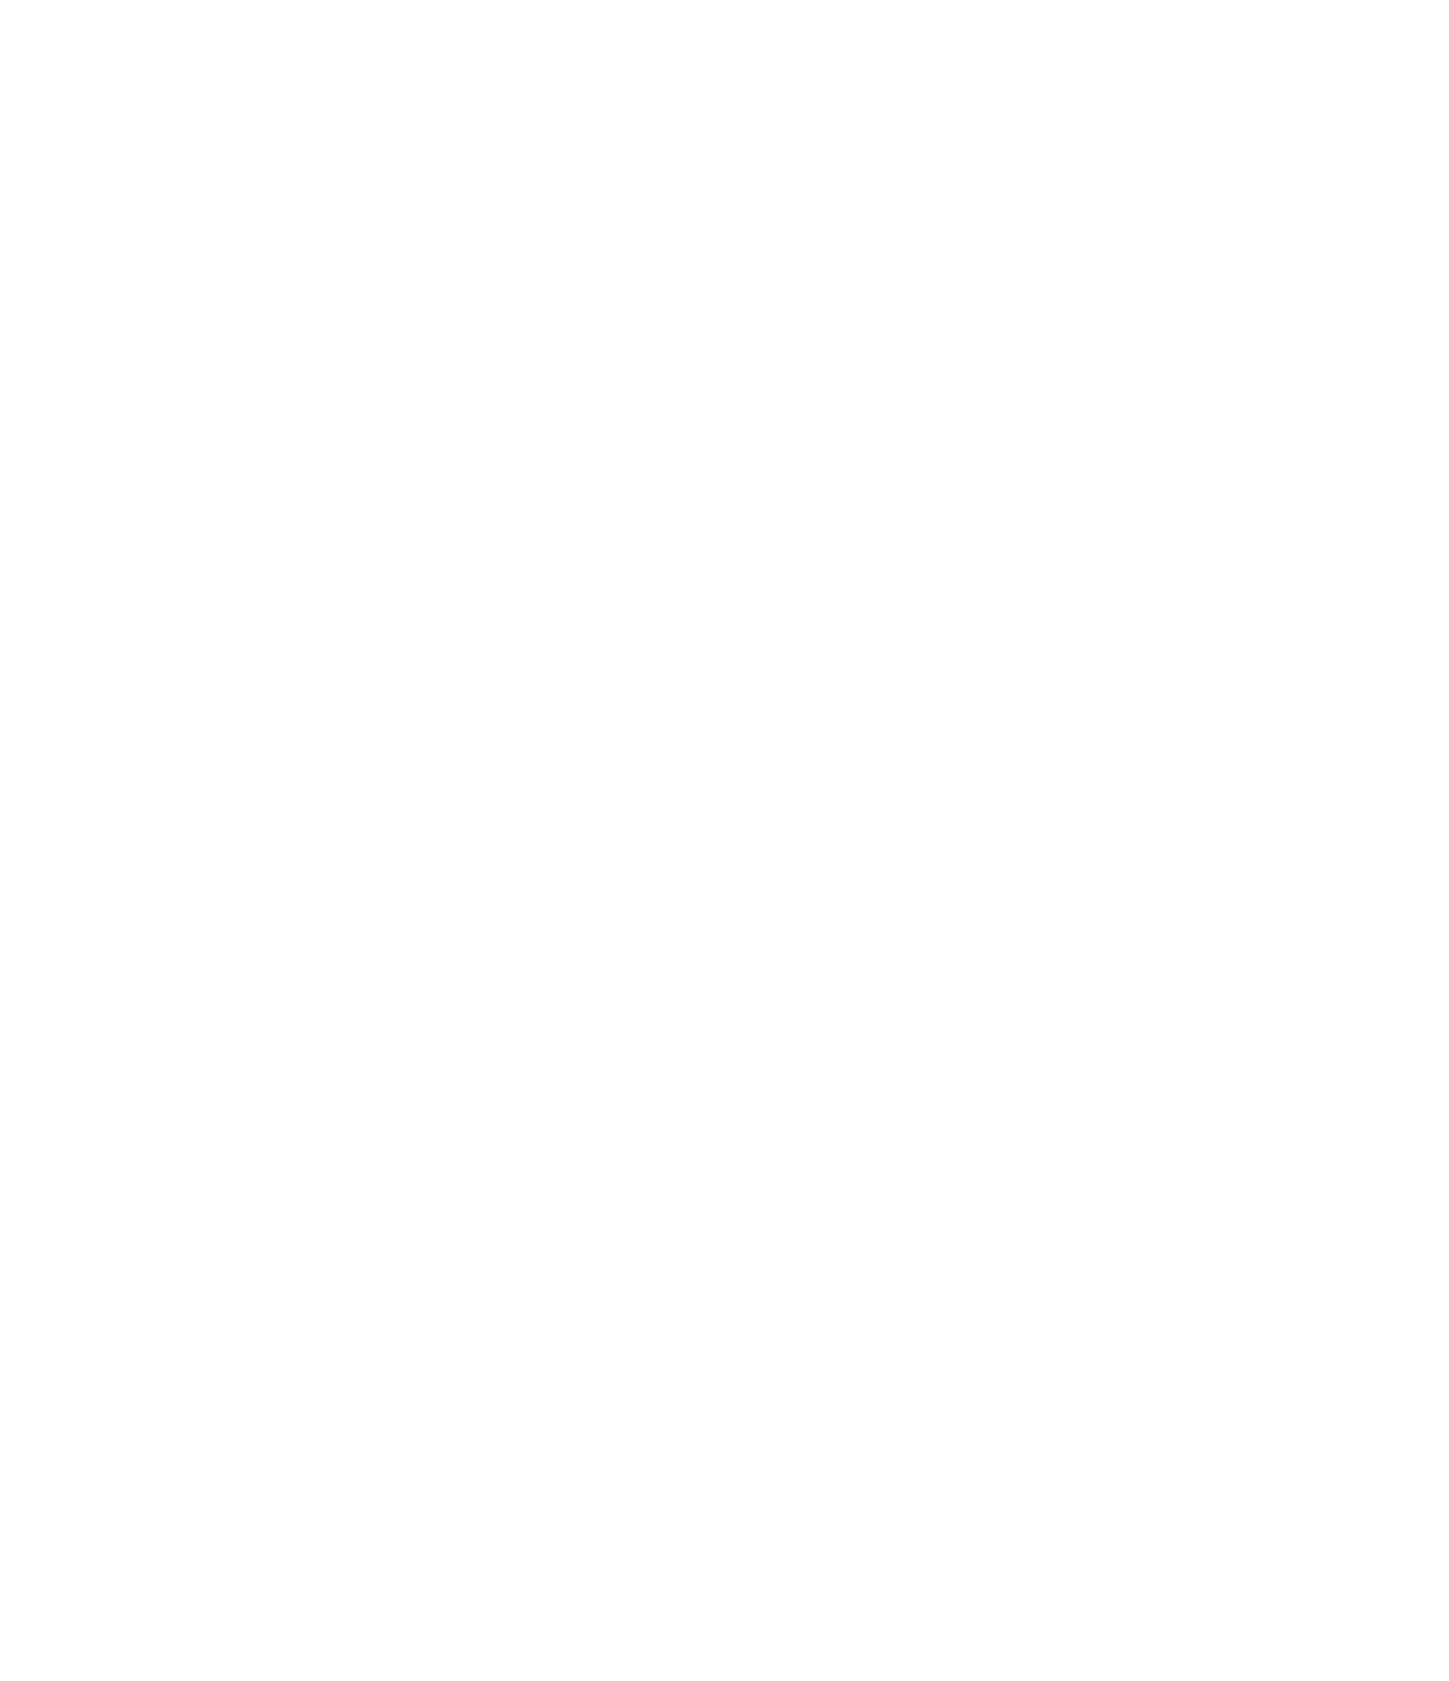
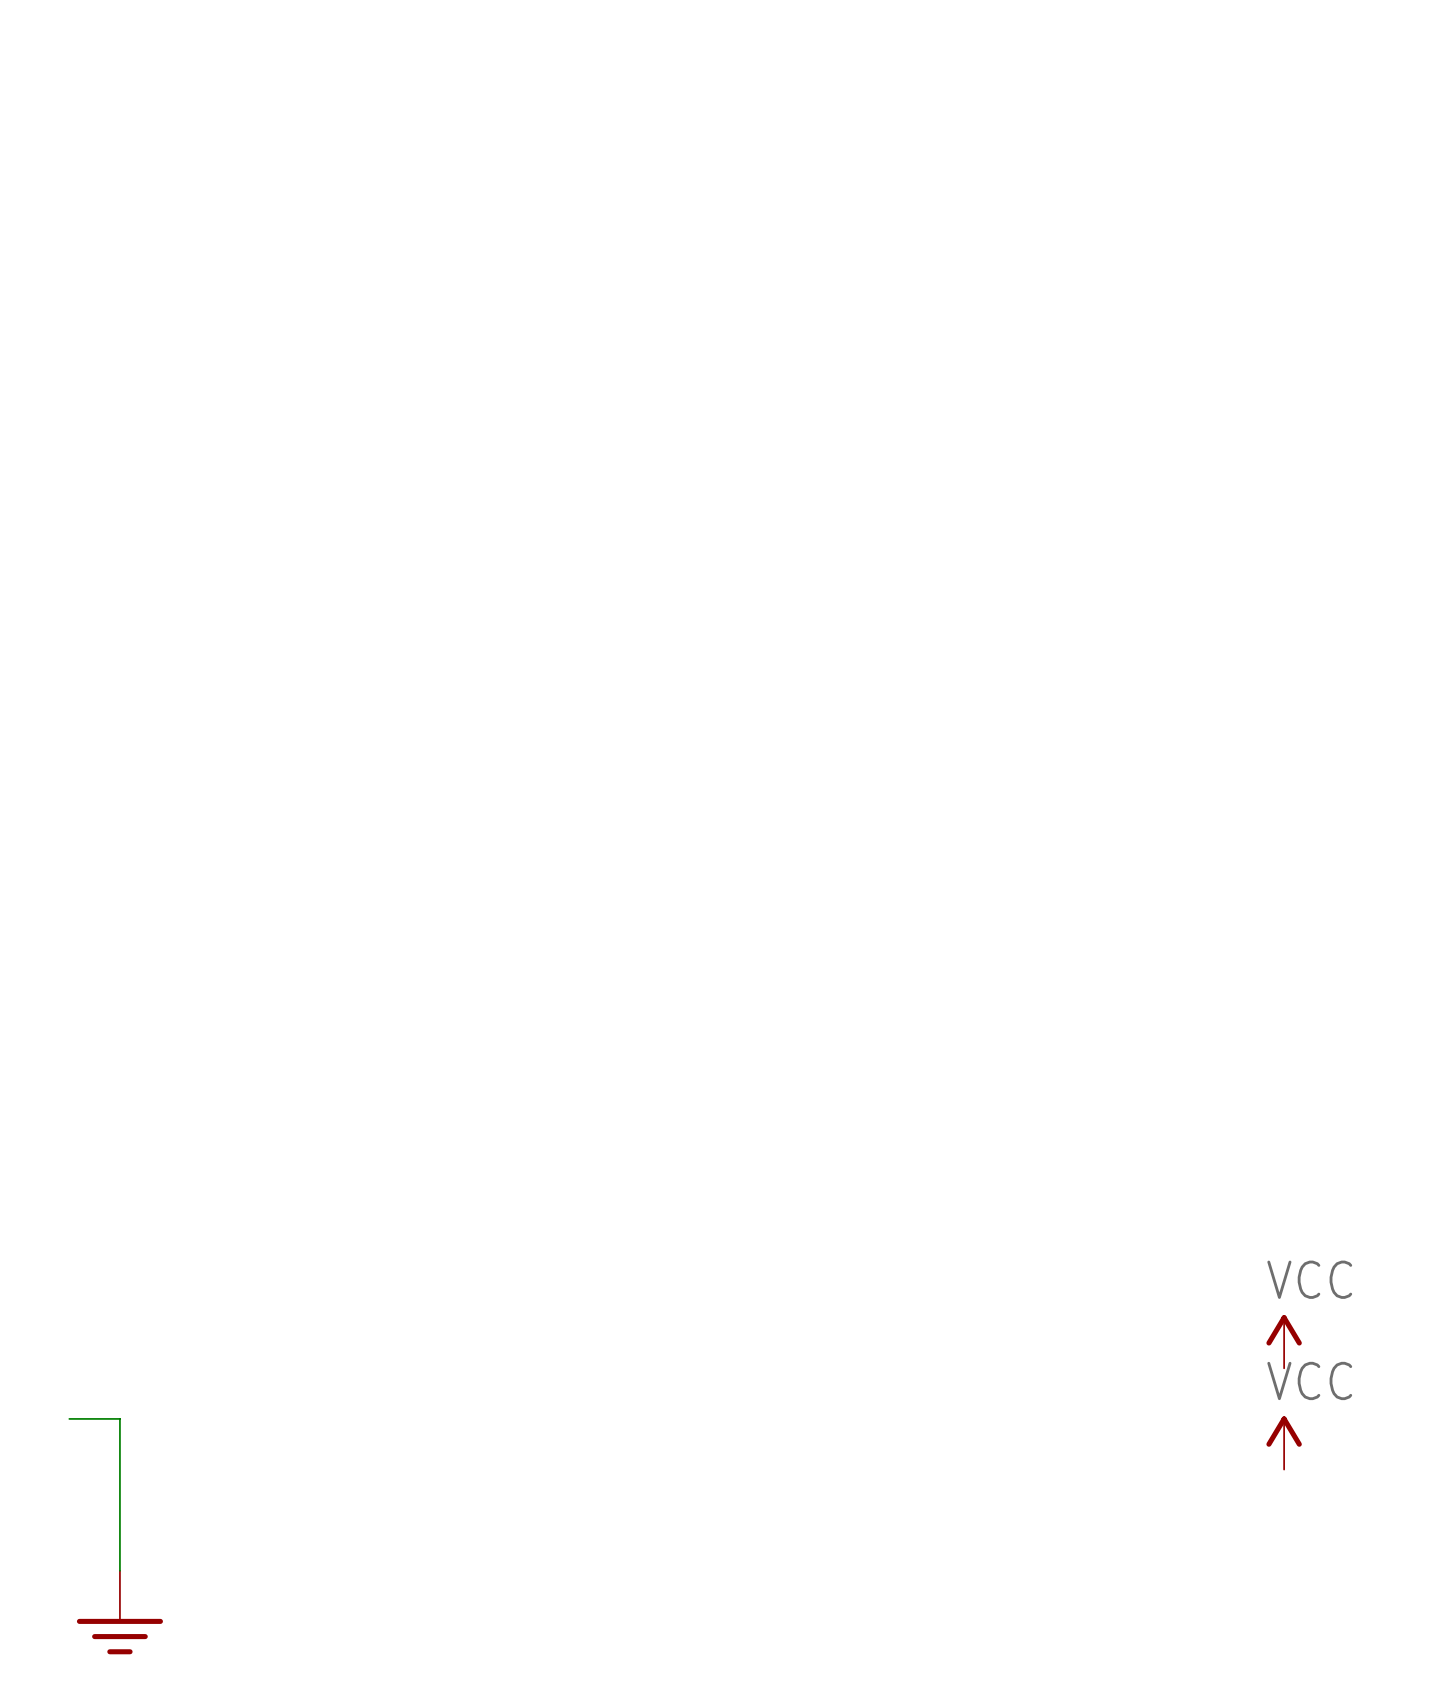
power symbol: none -> VCC (1284, 1341)
wire: none -> (69, 1418) (119, 1418) (119, 1570)
power symbol: none -> VCC (1284, 1442)
power symbol: none -> (119, 1612)

